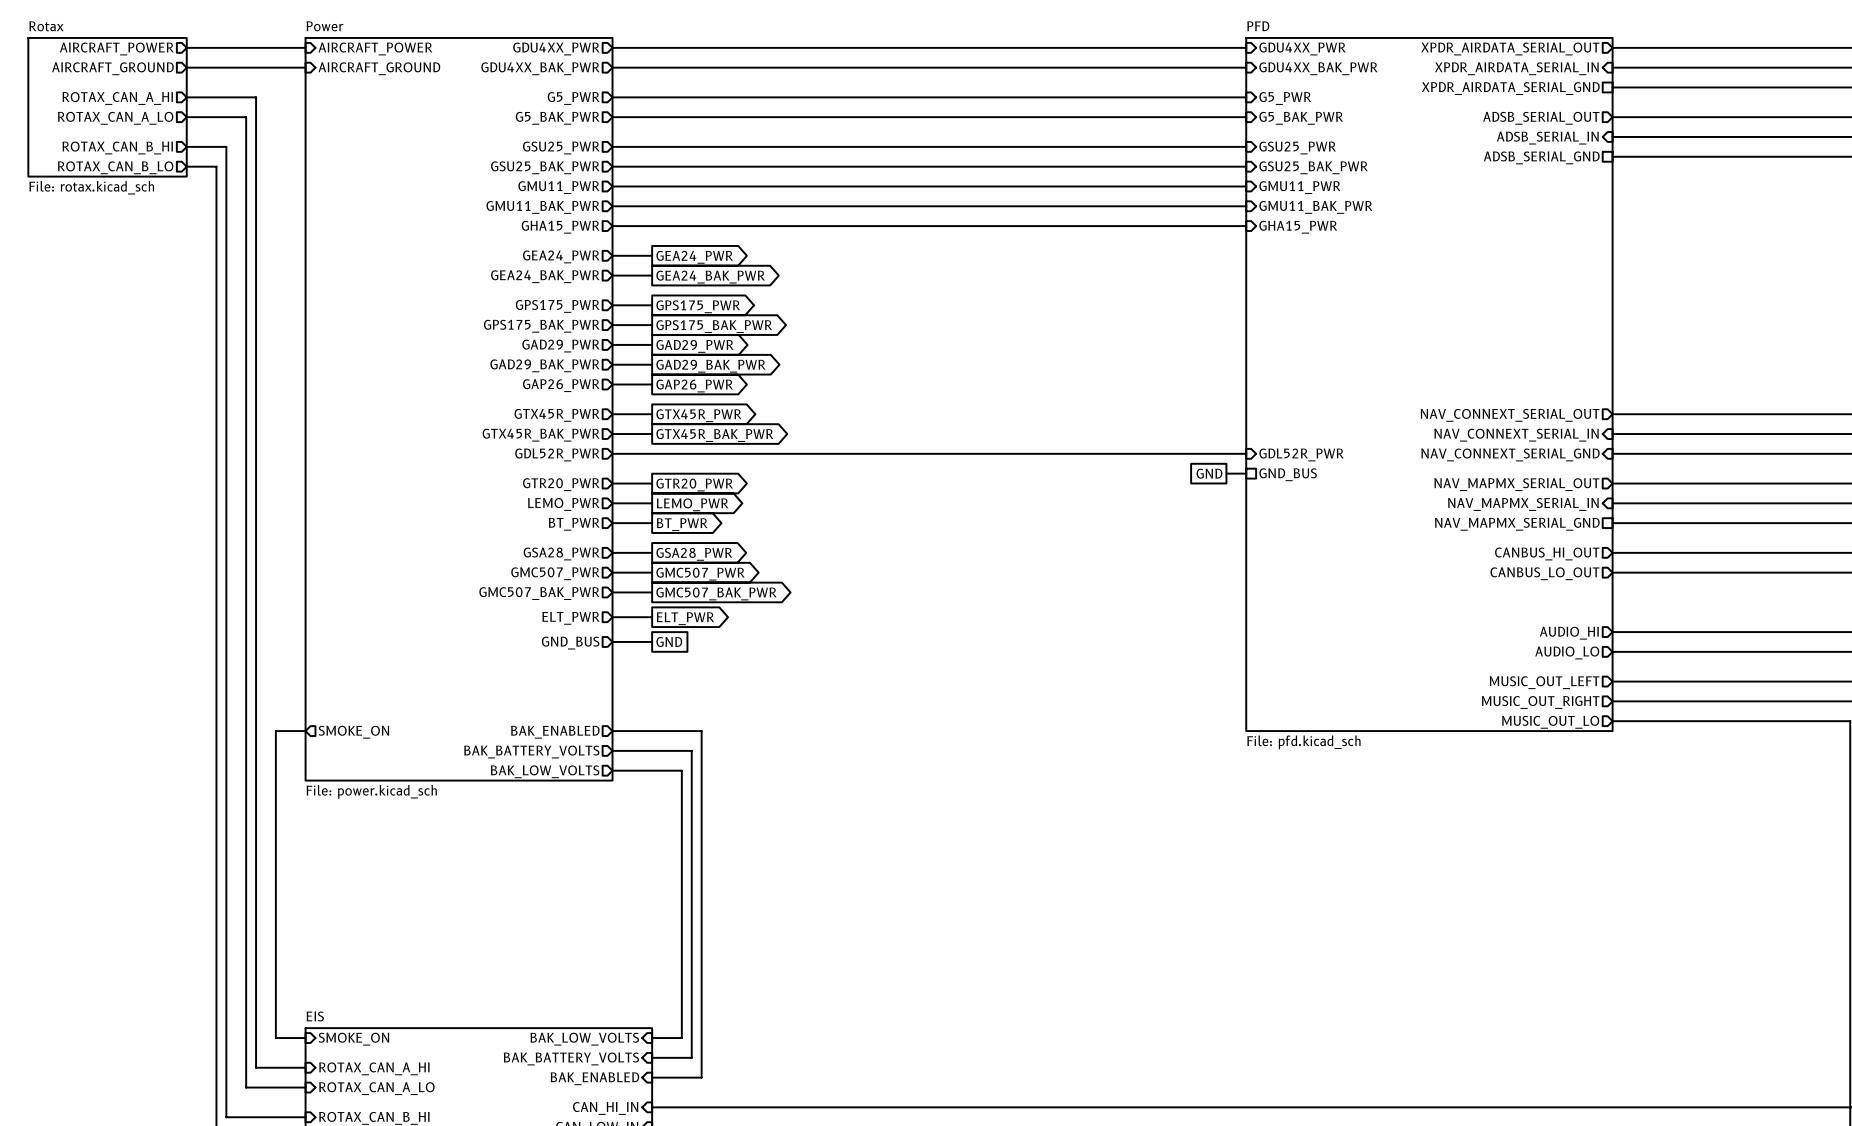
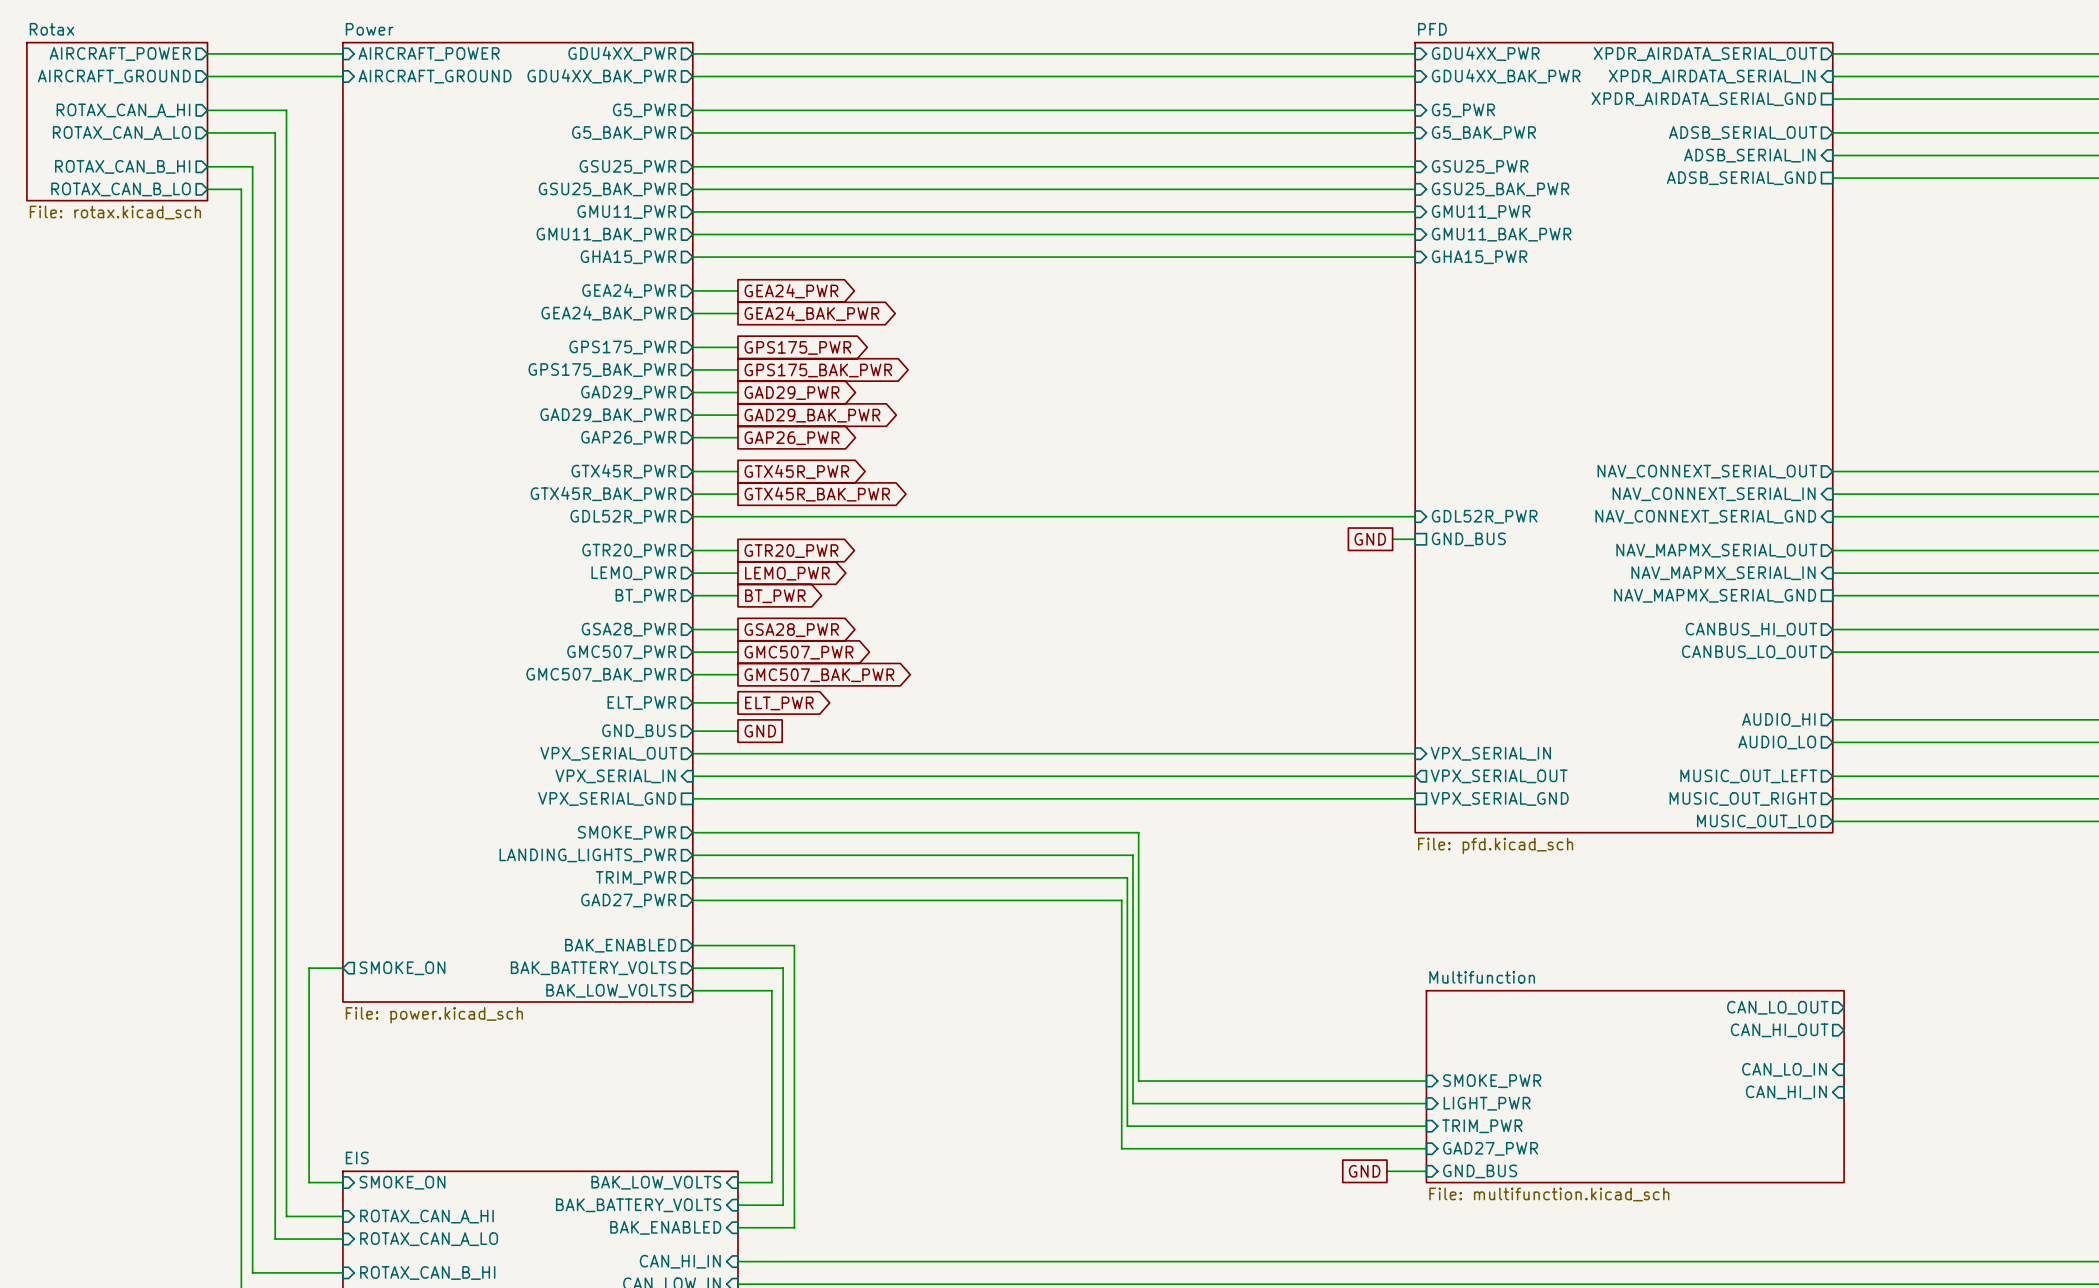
sheet Power: File: power.kicad_sch (459, 409) -> none
sheet Power: none -> File: power.kicad_sch (517, 522)
wire: none -> (692, 753) (1415, 753)
sheet pin: none -> VPX_SERIAL_OUT (608, 753)
sheet pin: none -> VPX_SERIAL_IN (1490, 753)
wire: none -> (692, 776) (1415, 776)
sheet pin: none -> VPX_SERIAL_IN (615, 776)
sheet pin: none -> VPX_SERIAL_OUT (1499, 776)
wire: none -> (692, 798) (1415, 798)
sheet pin: none -> VPX_SERIAL_GND (607, 798)
sheet pin: none -> VPX_SERIAL_GND (1499, 798)
wire: (305, 731) (275, 731) (275, 849) -> (342, 968) (309, 968)
wire: (701, 731) (701, 830) -> (692, 945) (794, 945)
wire: none -> (794, 832) (1138, 832) (1138, 1081) (1426, 1081)
sheet pin position: SMOKE_ON (353, 732) -> SMOKE_ON (402, 968)
sheet pin: BAK_ENABLED (555, 732) -> SMOKE_PWR (627, 832)
wire: (691, 750) (691, 849) -> (692, 968) (783, 968)
wire: none -> (783, 855) (1133, 855) (1133, 1103) (1426, 1103)
sheet pin: BAK_BATTERY_VOLTS (531, 751) -> LANDING_LIGHTS_PWR (587, 855)
wire: (681, 770) (681, 869) -> (692, 990) (771, 990)
wire: none -> (771, 877) (1127, 877) (1127, 1126) (1426, 1126)
sheet pin: BAK_LOW_VOLTS (545, 771) -> TRIM_PWR (635, 877)
wire: none -> (692, 900) (1121, 900) (1121, 1148) (1426, 1148)
sheet pin: none -> GAD27_PWR (628, 900)
sheet pin: none -> BAK_ENABLED (620, 945)
sheet pin: none -> BAK_BATTERY_VOLTS (593, 968)
sheet pin: none -> BAK_LOW_VOLTS (611, 990)
sheet pin: none -> CAN_LO_OUT (1777, 1007)
sheet pin: none -> CAN_HI_OUT (1779, 1030)
sheet pin: none -> CAN_LO_IN (1784, 1069)
sheet pin: none -> SMOKE_PWR (1492, 1081)
sheet Multifunction: none -> File: multifunction.kicad_sch (1635, 1086)
sheet pin: none -> CAN_HI_IN (1786, 1092)
sheet pin: none -> LIGHT_PWR (1487, 1103)
sheet pin: none -> TRIM_PWR (1482, 1126)
sheet pin: none -> GAD27_PWR (1490, 1148)
global label: none -> GND (1364, 1171)
wire: none -> (1386, 1171) (1426, 1171)
sheet pin: none -> GND_BUS (1480, 1171)

